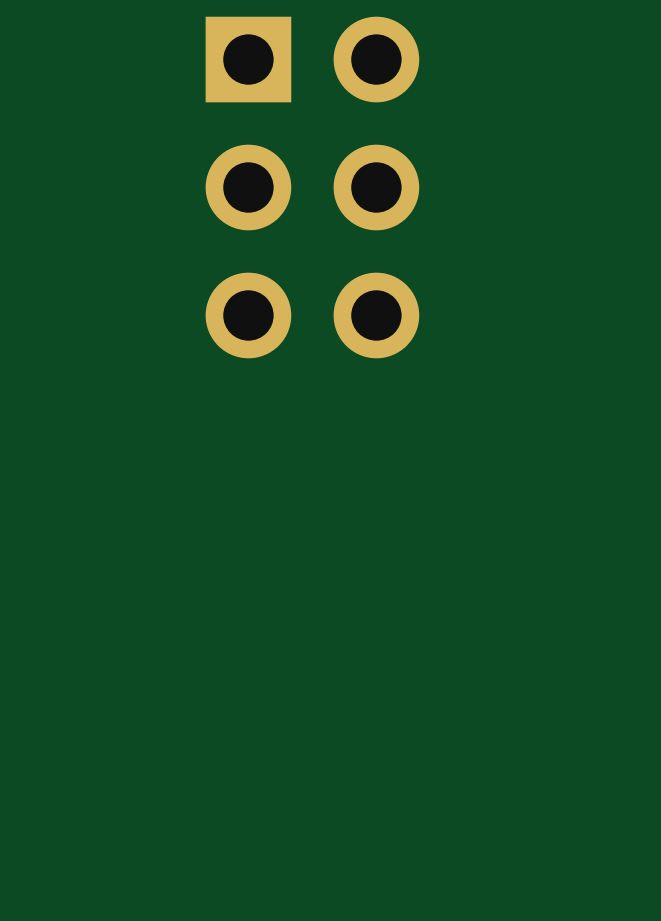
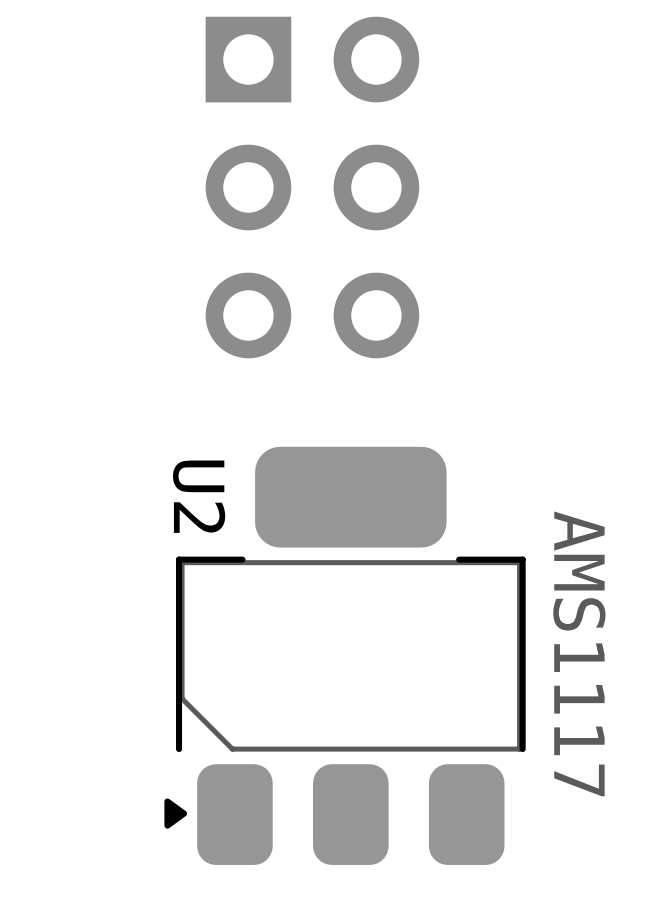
U2: none -> AMS1117 (345, 655)

